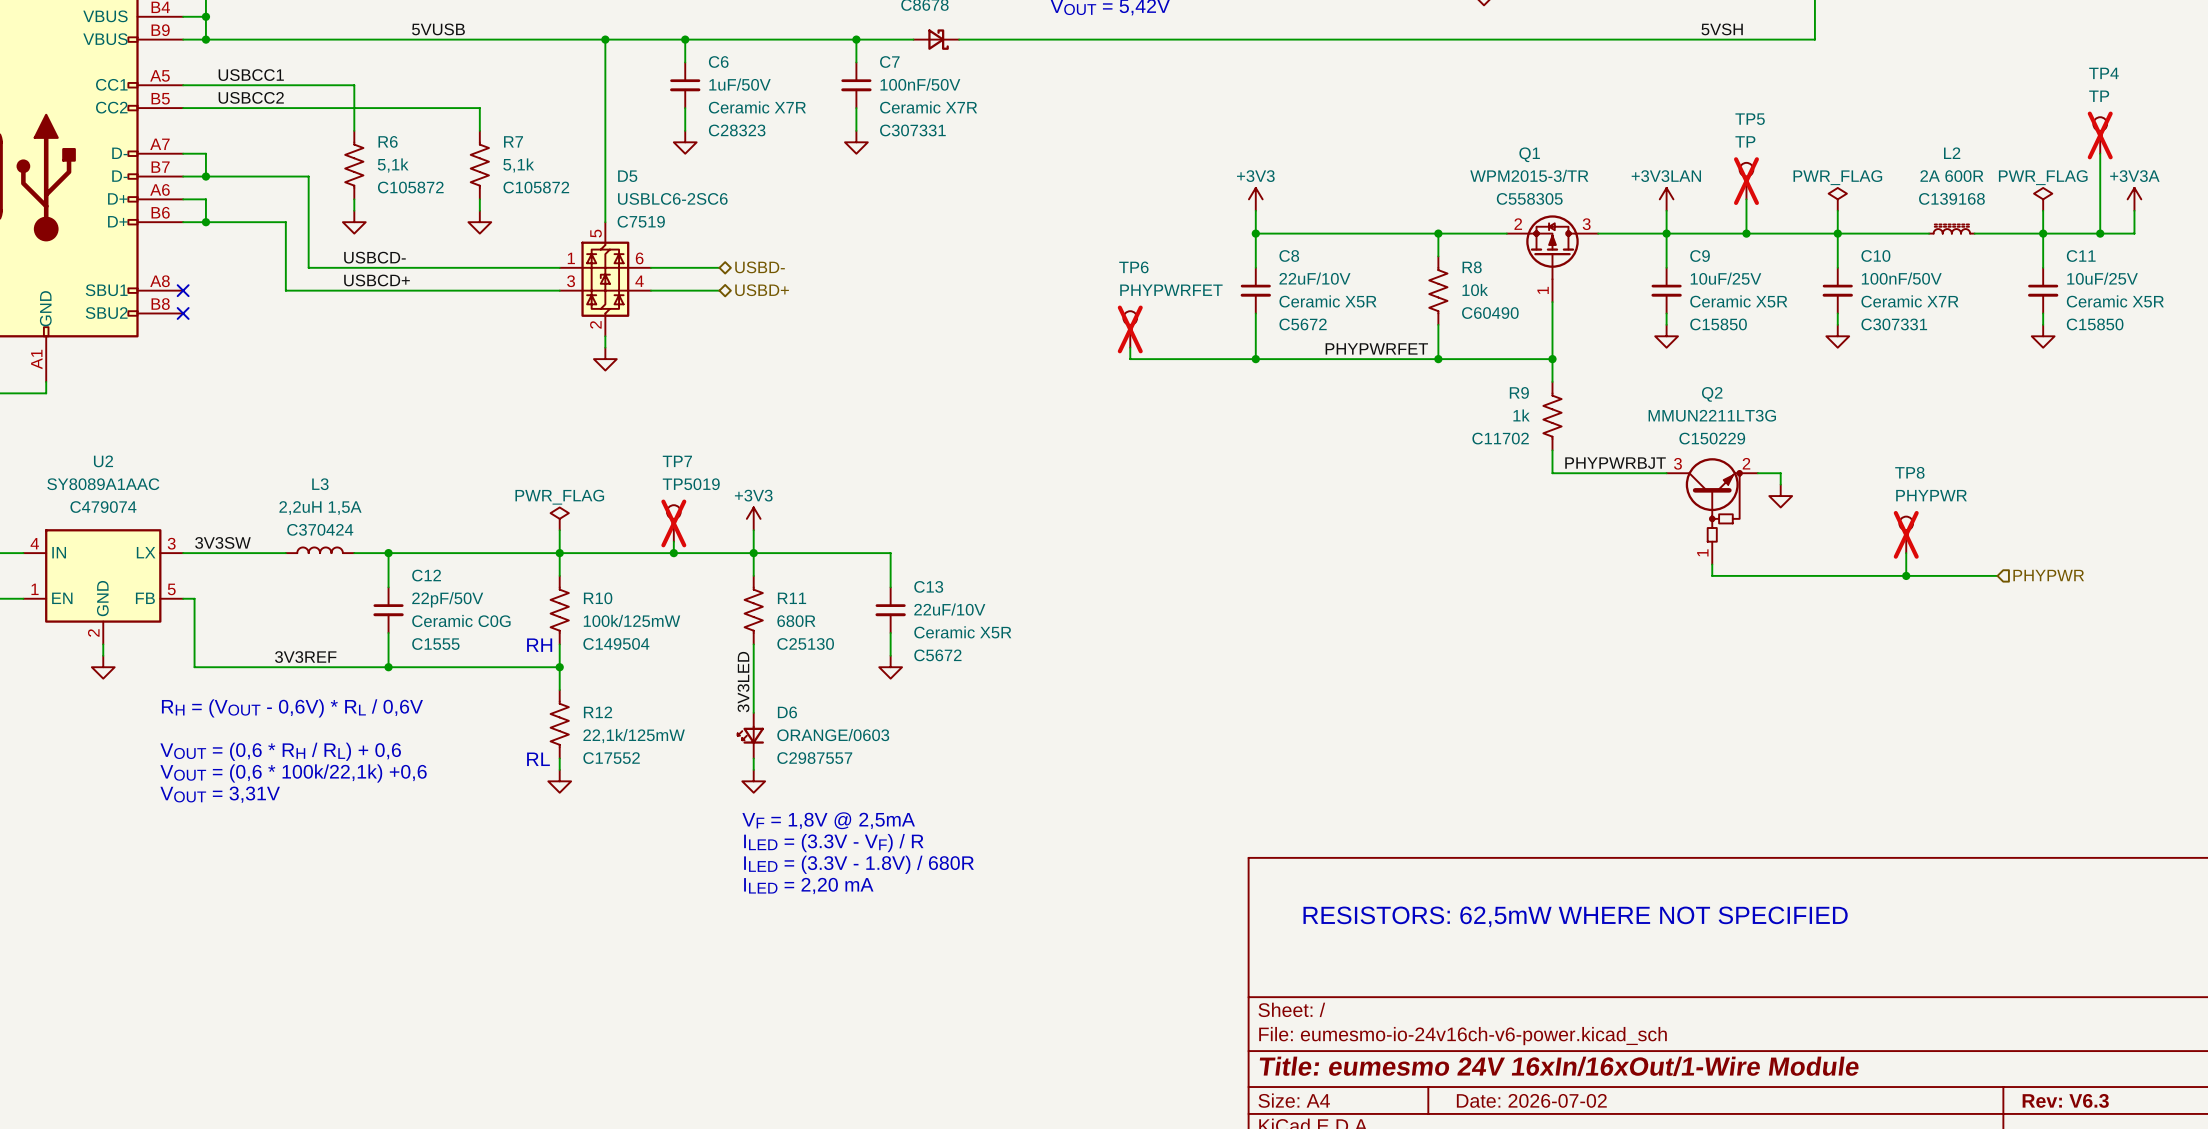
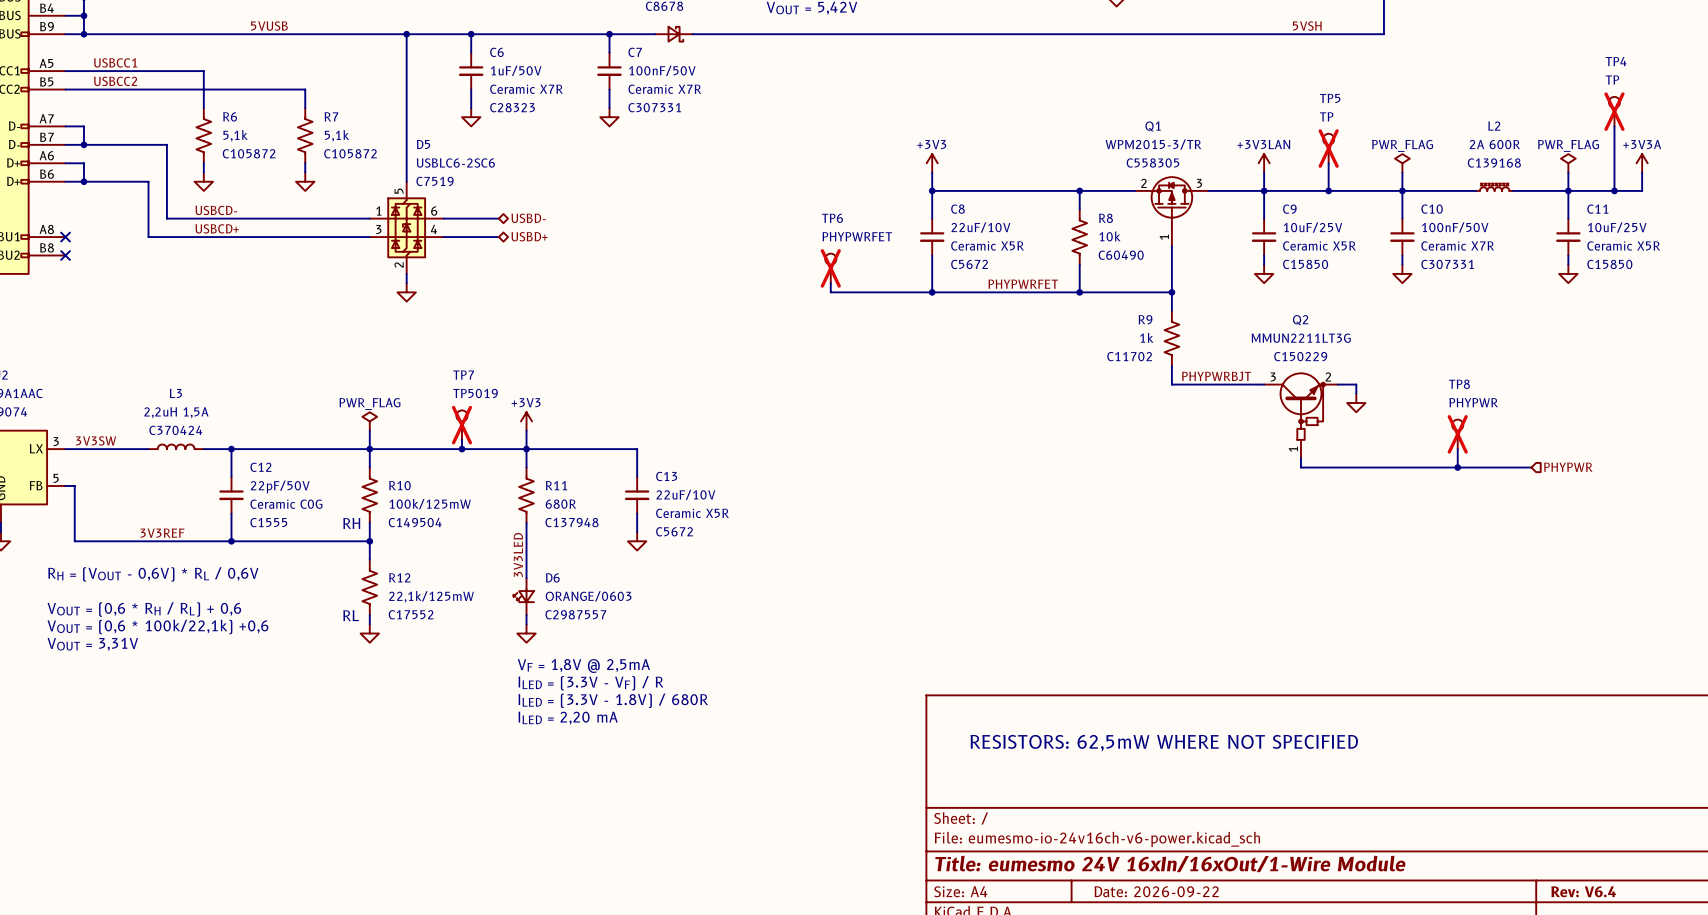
R11 text: C25130 (805, 643) -> C137948 (572, 522)
title block: Date: 2026-07-02 (1531, 1100) -> Date: 2026-09-22 (1156, 891)
title block: Rev: V6.3 (2065, 1100) -> Rev: V6.4 (1583, 891)

